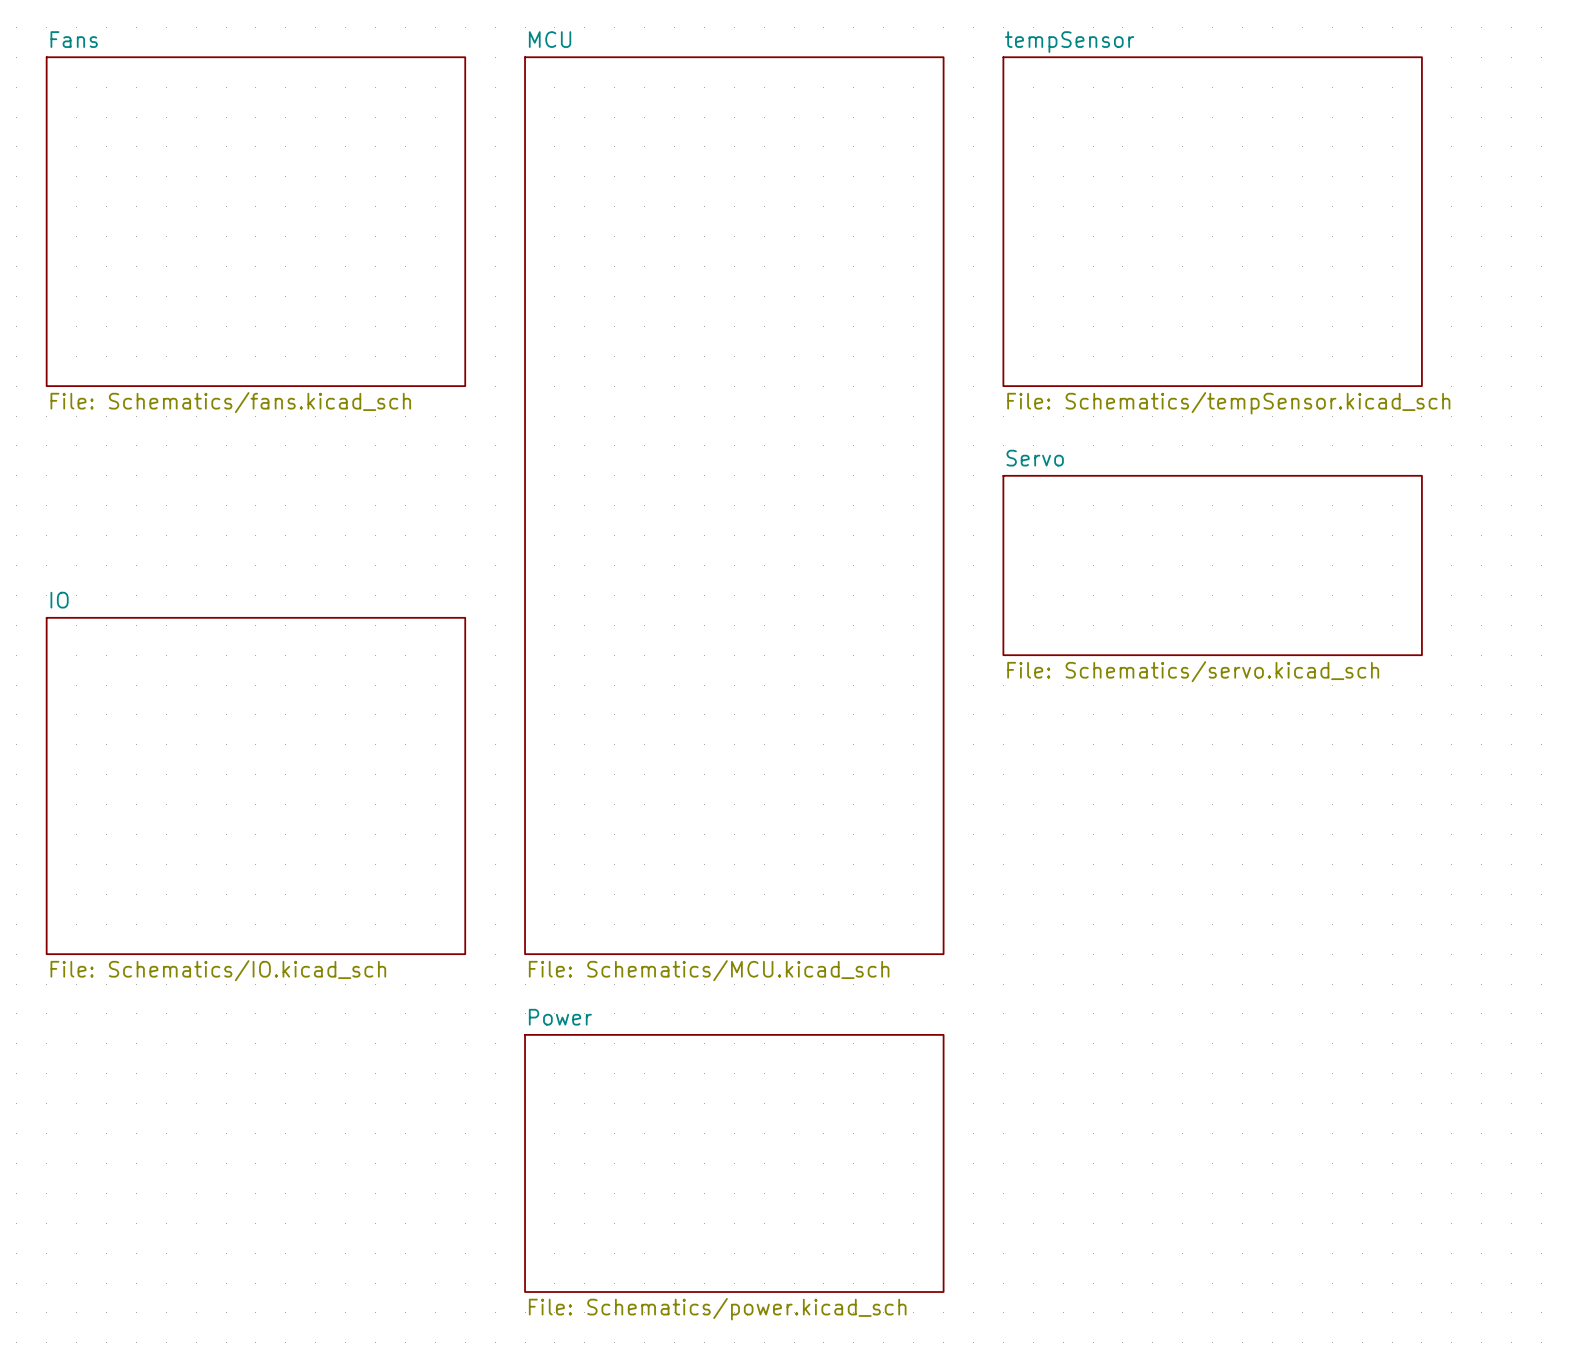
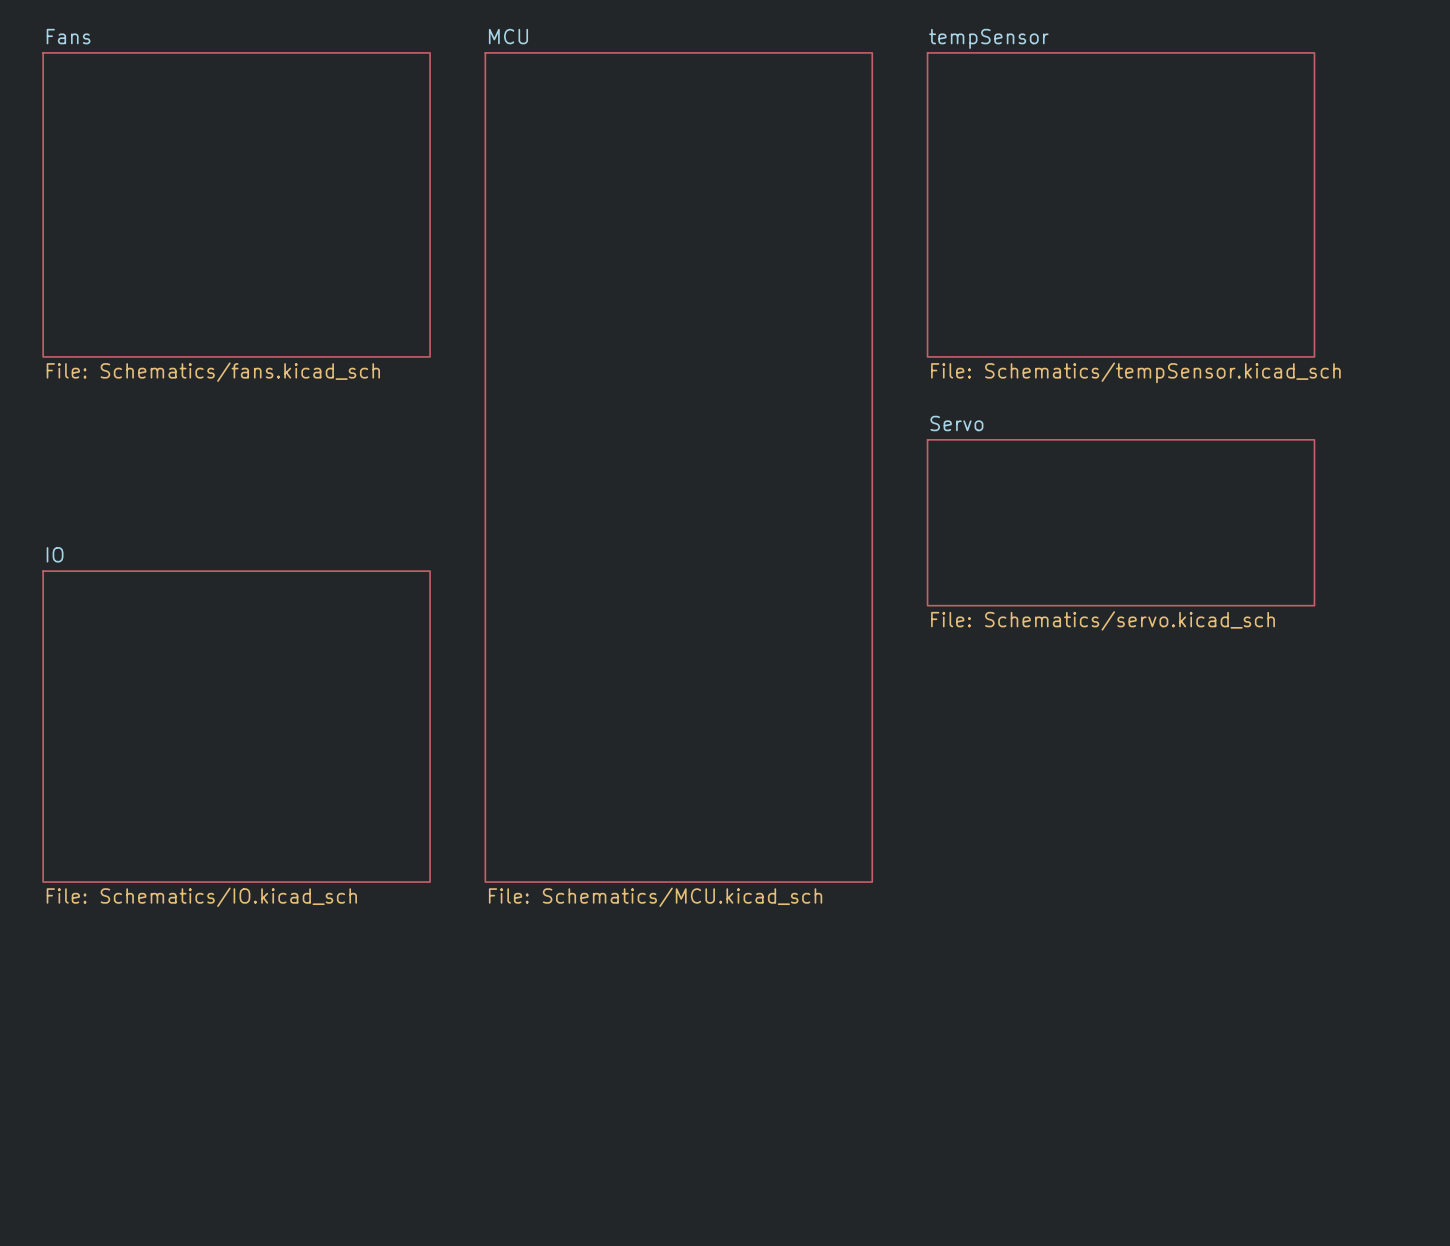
sheet Power: File: Schematics/power.kicad_sch (734, 1163) -> none

